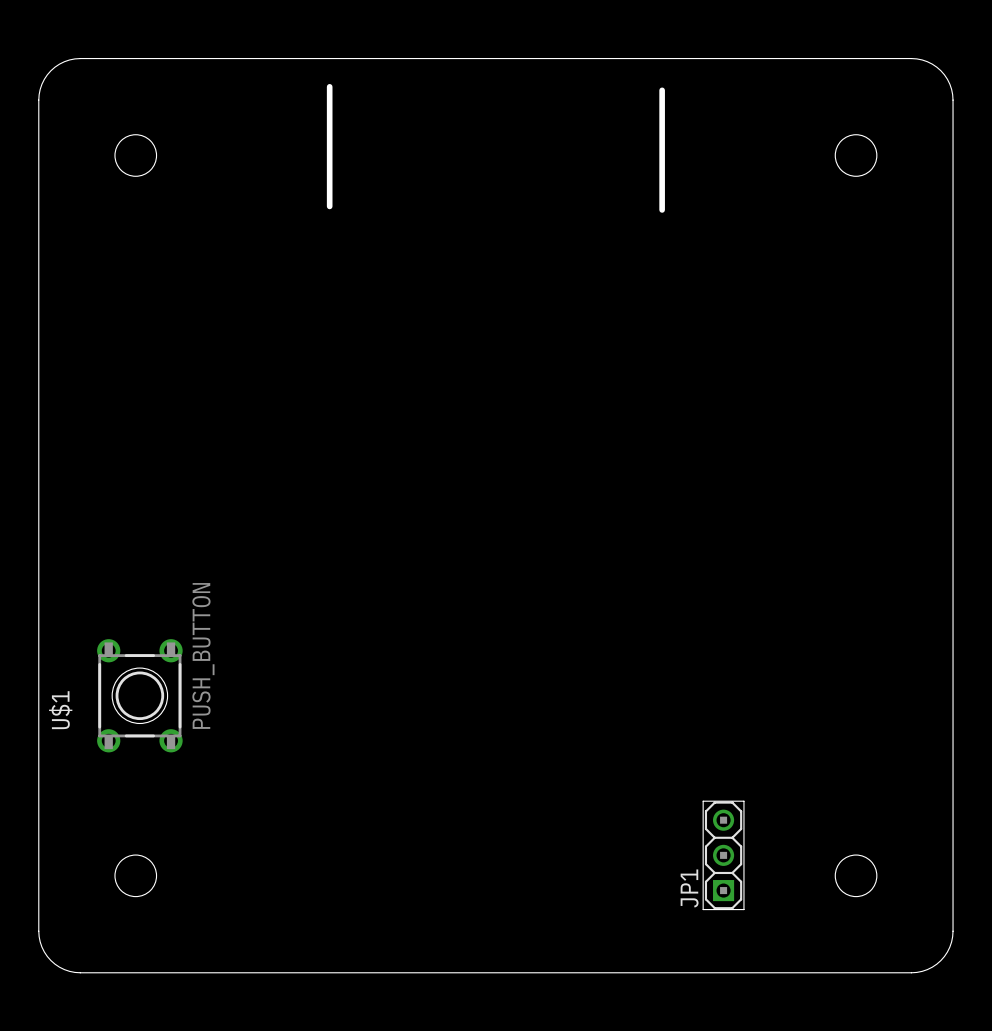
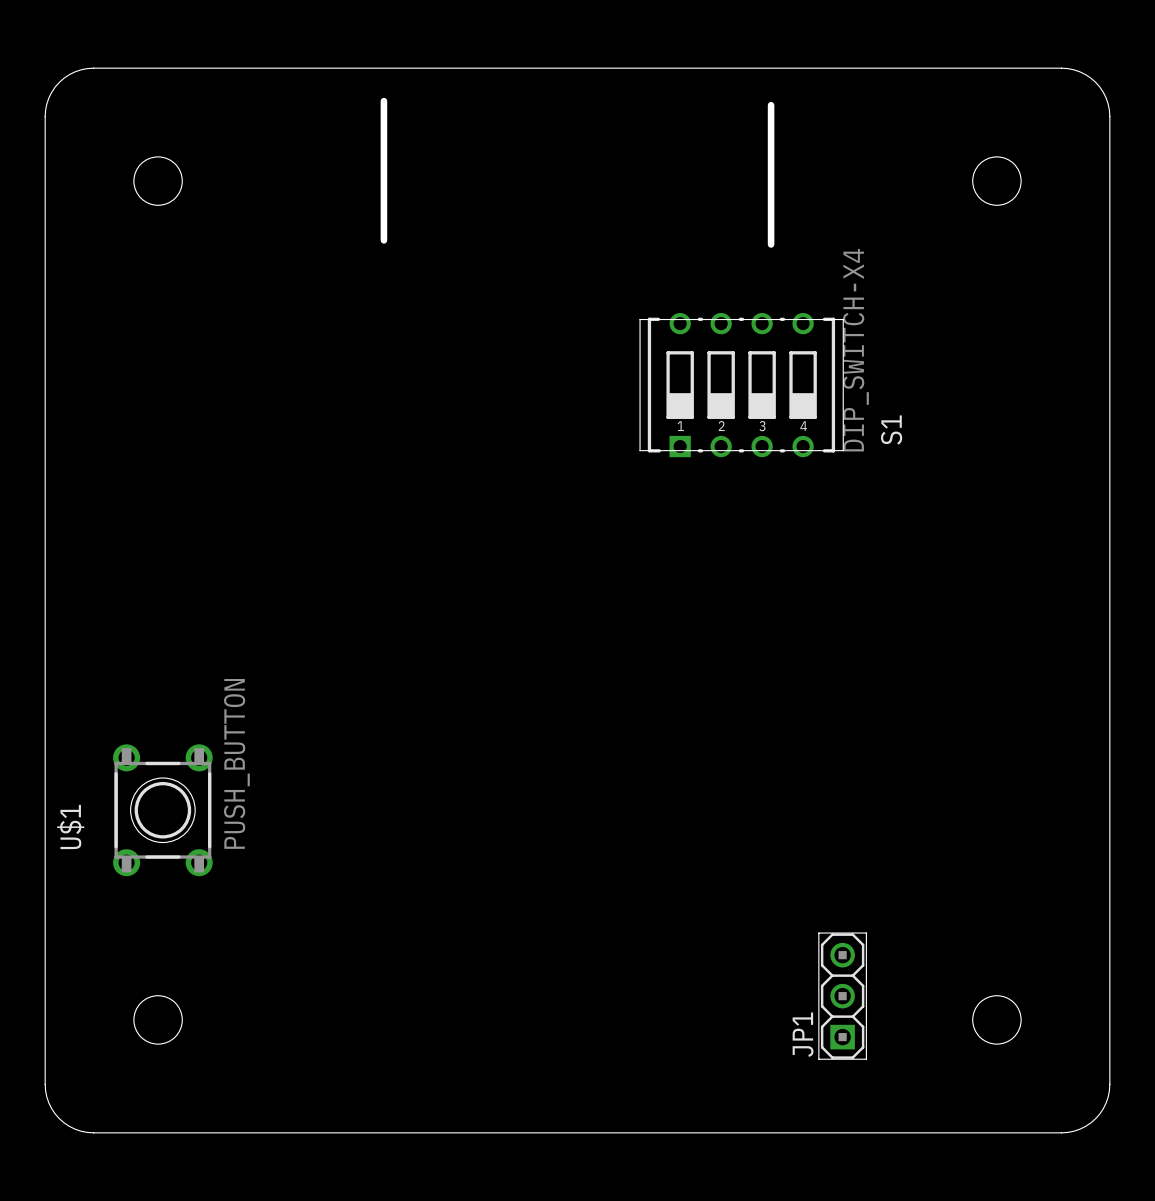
board edge: none -> (640, 319) (640, 450) (843, 450) (843, 319) (640, 319)
S1: none -> DIP_SWITCH-X4 (741, 385)

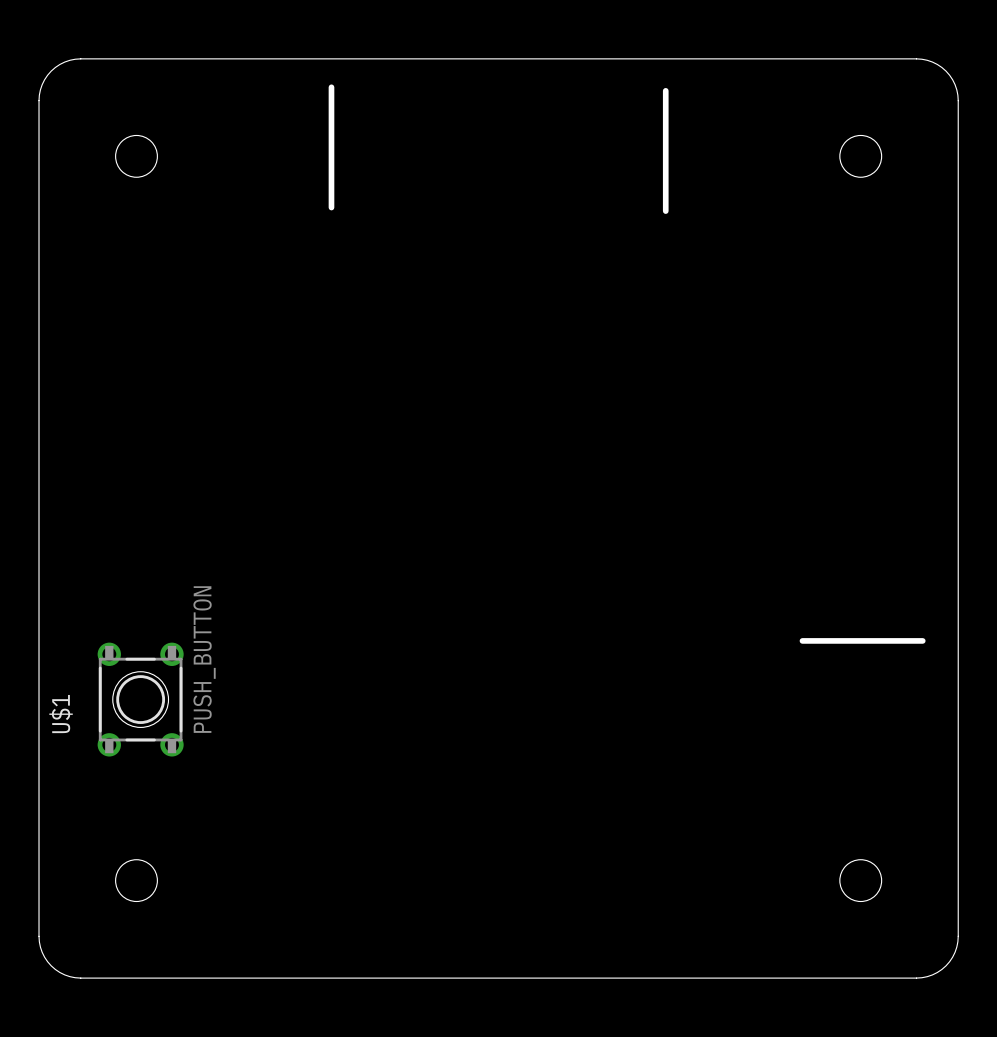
board edge: (640, 319) (640, 450) (843, 450) (843, 319) (640, 319) -> none
S1: DIP_SWITCH-X4 (741, 385) -> none
board edge: none -> (802, 640) (922, 640)
board edge: (818, 933) (818, 1059) (866, 1059) (866, 933) (818, 933) -> none
JP1: (842, 996) -> none

